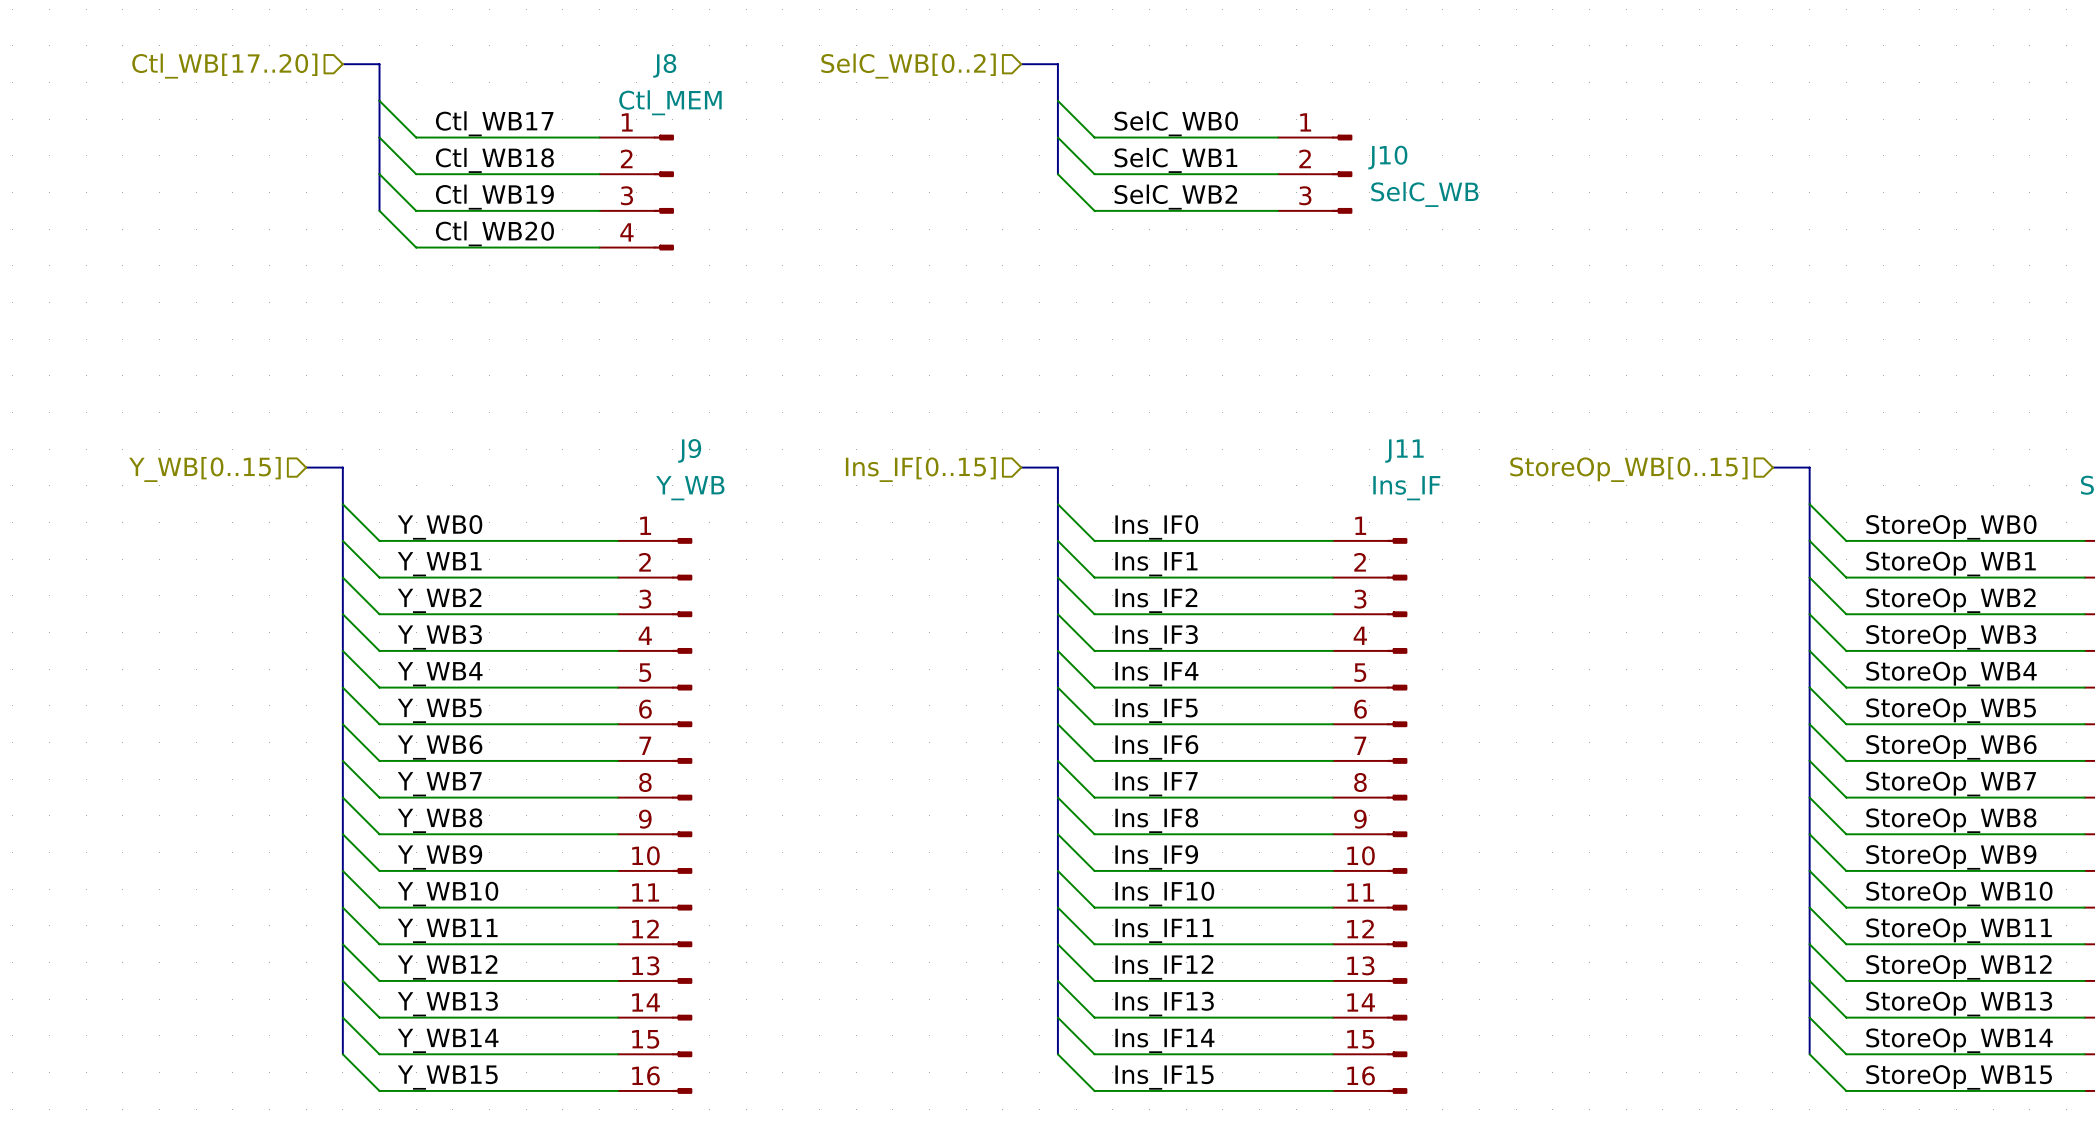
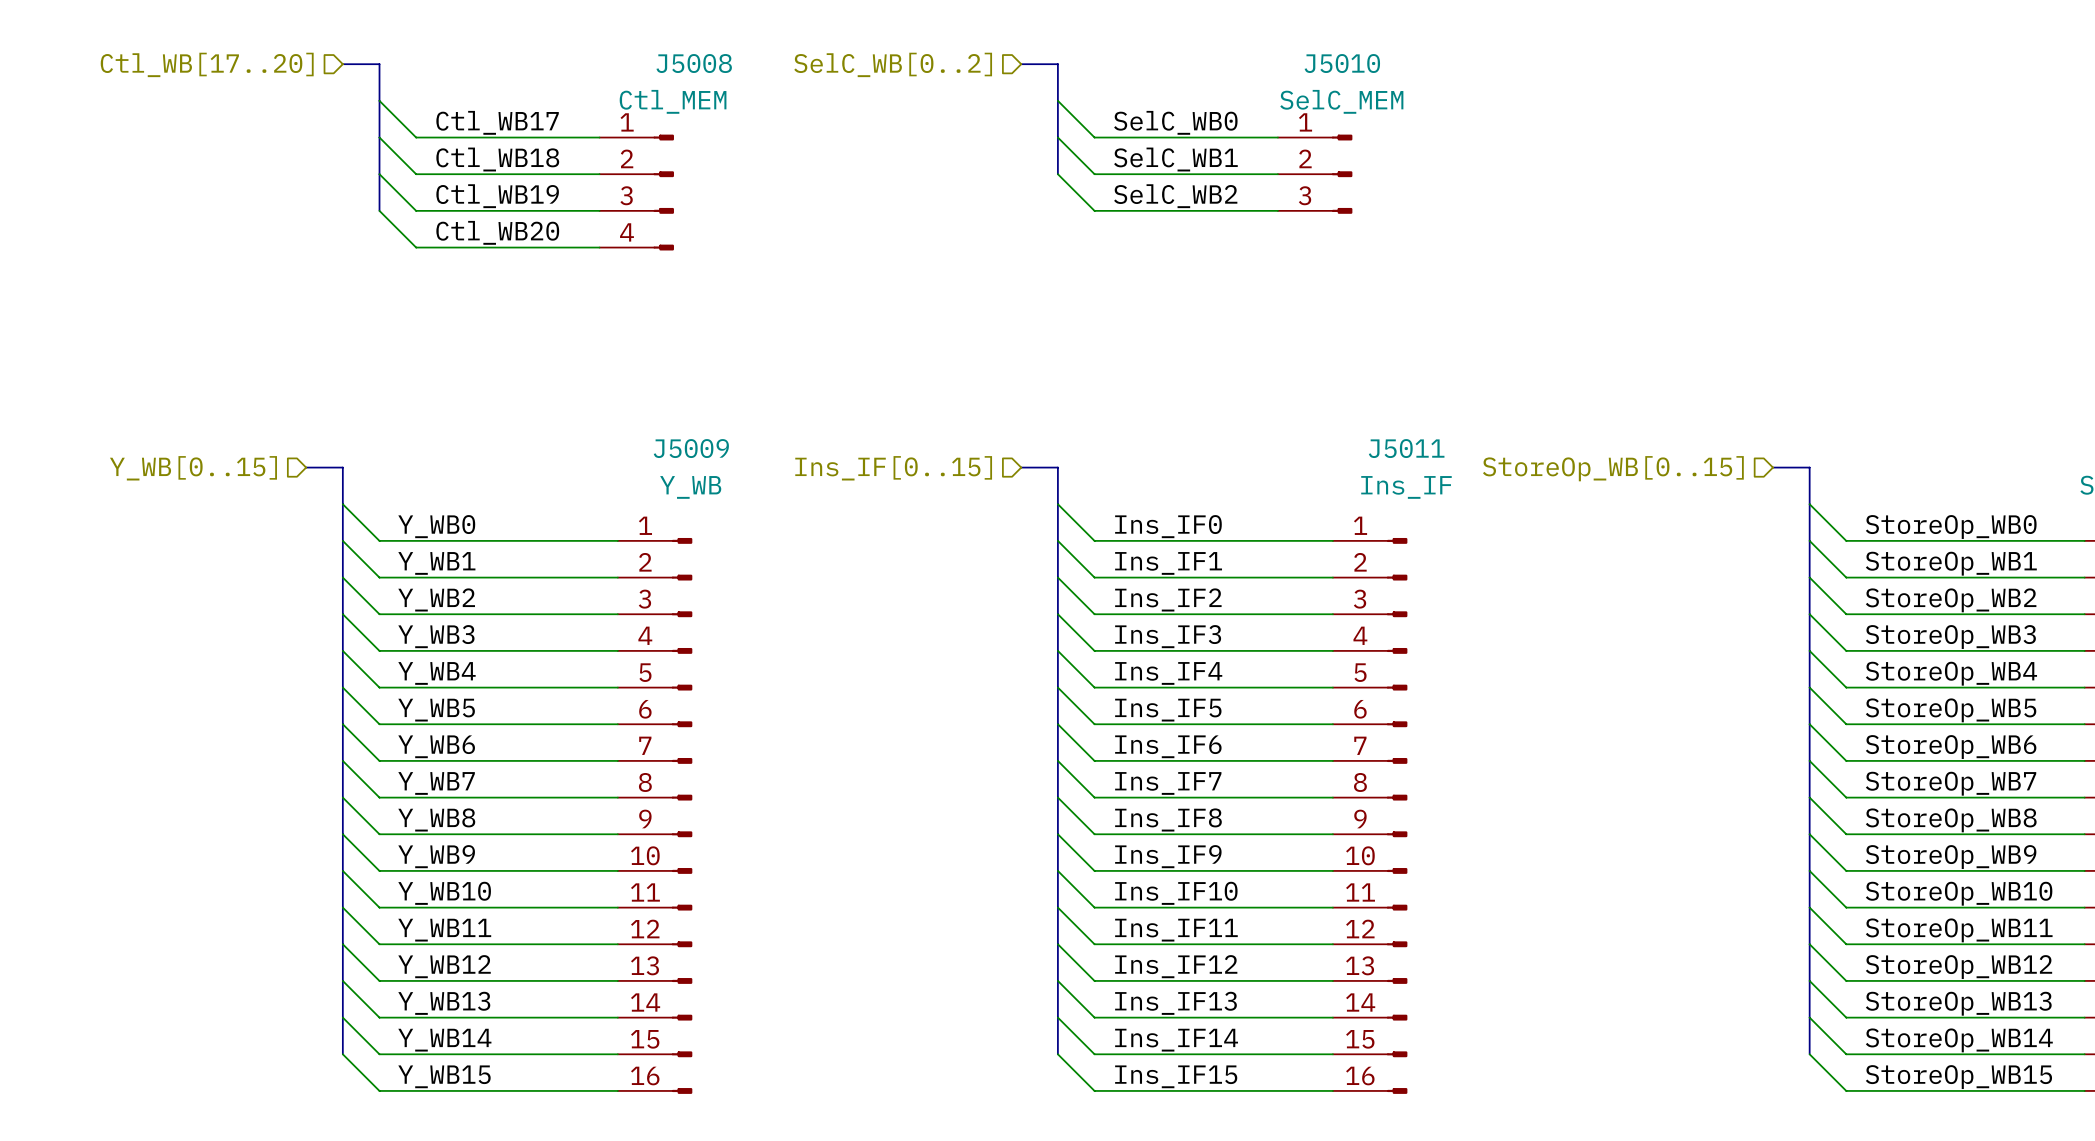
J8 name: J8 (664, 65) -> J5008 (694, 63)
J10 name: J10 (1387, 157) -> J5010 (1342, 63)
J10 value: SelC_WB (1424, 194) -> SelC_MEM (1341, 101)
J9 name: J9 (689, 450) -> J5009 (691, 448)
J11 name: J11 (1404, 451) -> J5011 (1406, 448)

